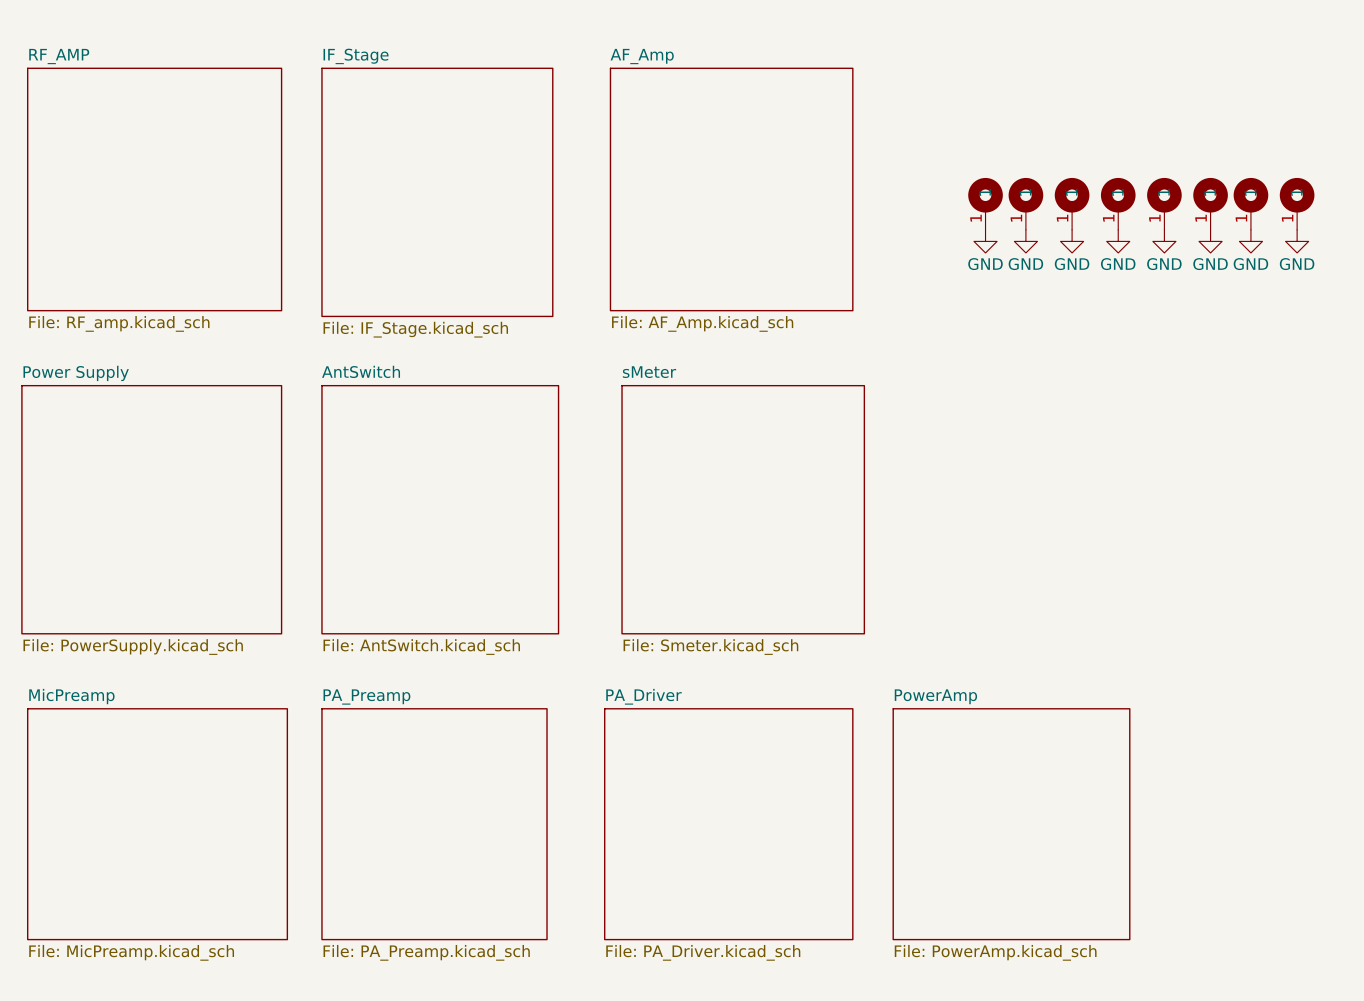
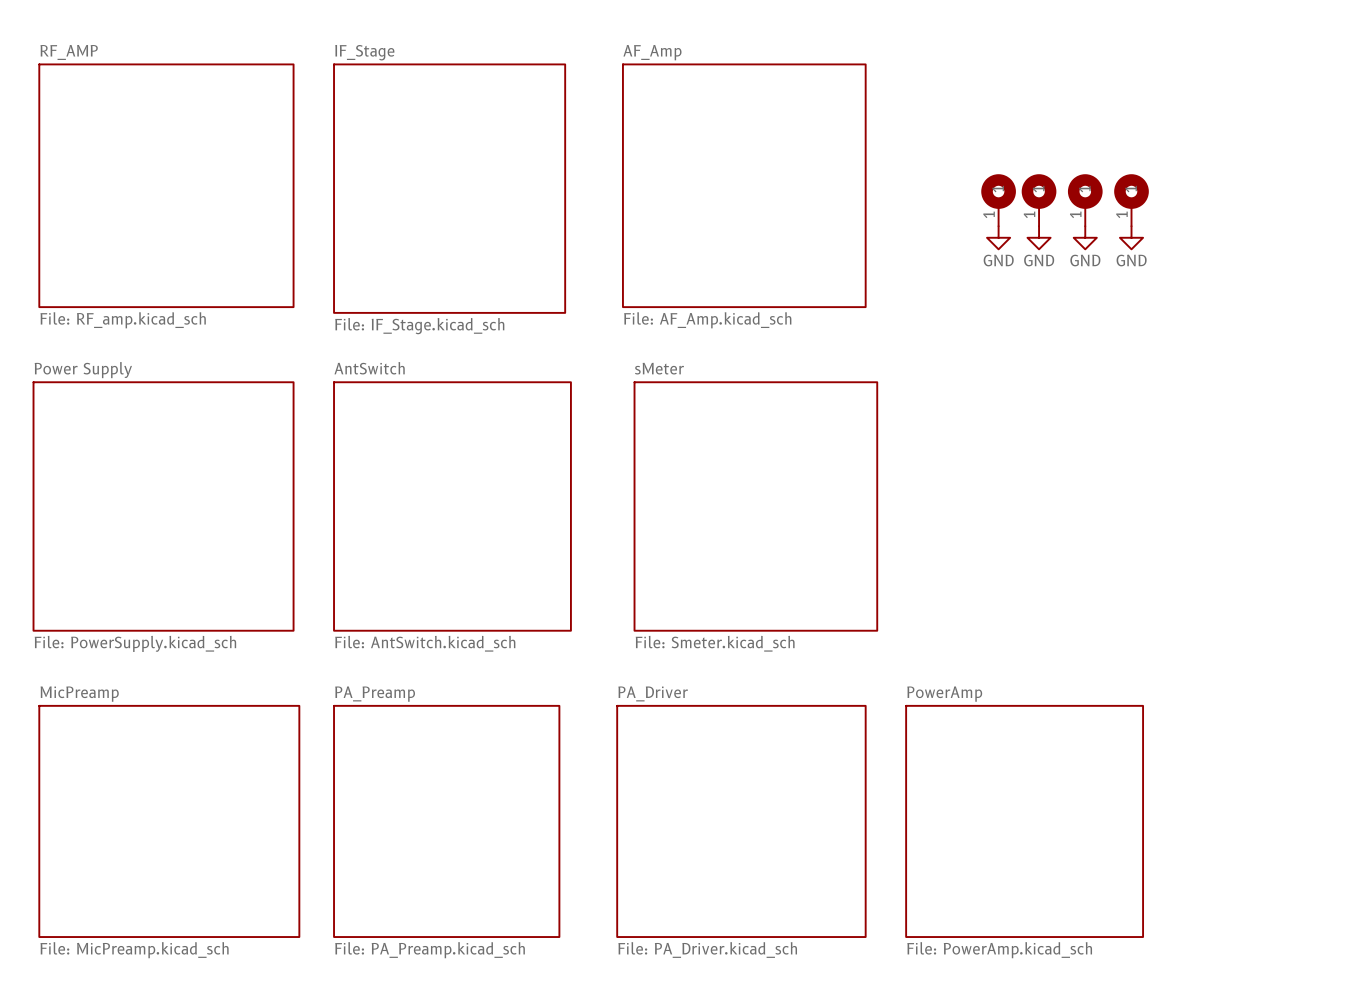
part: (1164, 203) -> none
part: (1210, 203) -> none
part: (1250, 203) -> none
part: (1297, 203) -> none
power symbol: GND (1164, 241) -> none
power symbol: GND (1210, 241) -> none
power symbol: GND (1250, 241) -> none
power symbol: GND (1297, 241) -> none

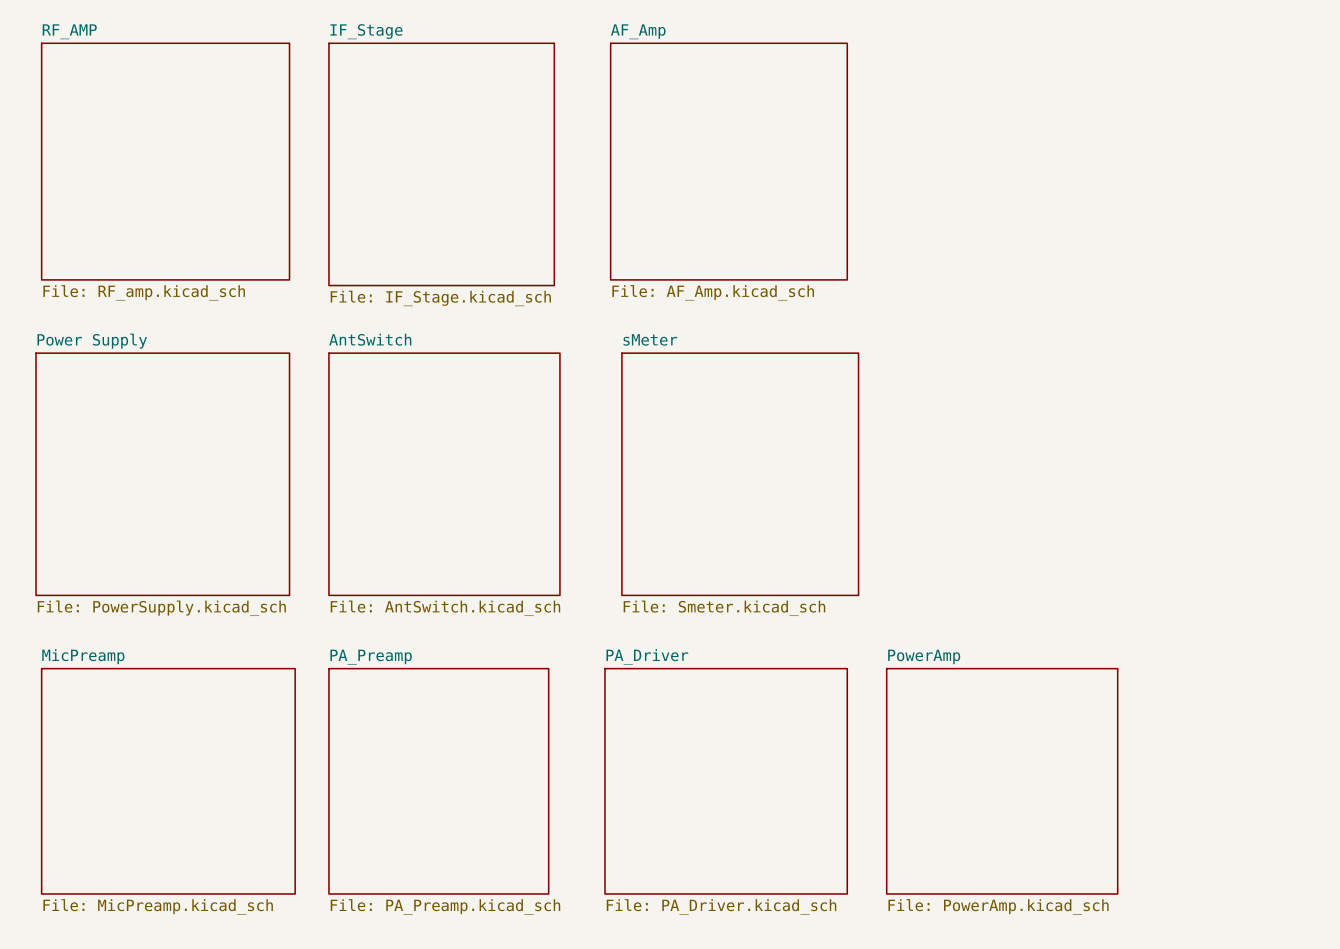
part: (998, 200) -> none
part: (1039, 200) -> none
part: (1085, 200) -> none
part: (1131, 200) -> none
power symbol: GND (998, 237) -> none
power symbol: GND (1039, 237) -> none
power symbol: GND (1085, 237) -> none
power symbol: GND (1131, 237) -> none

